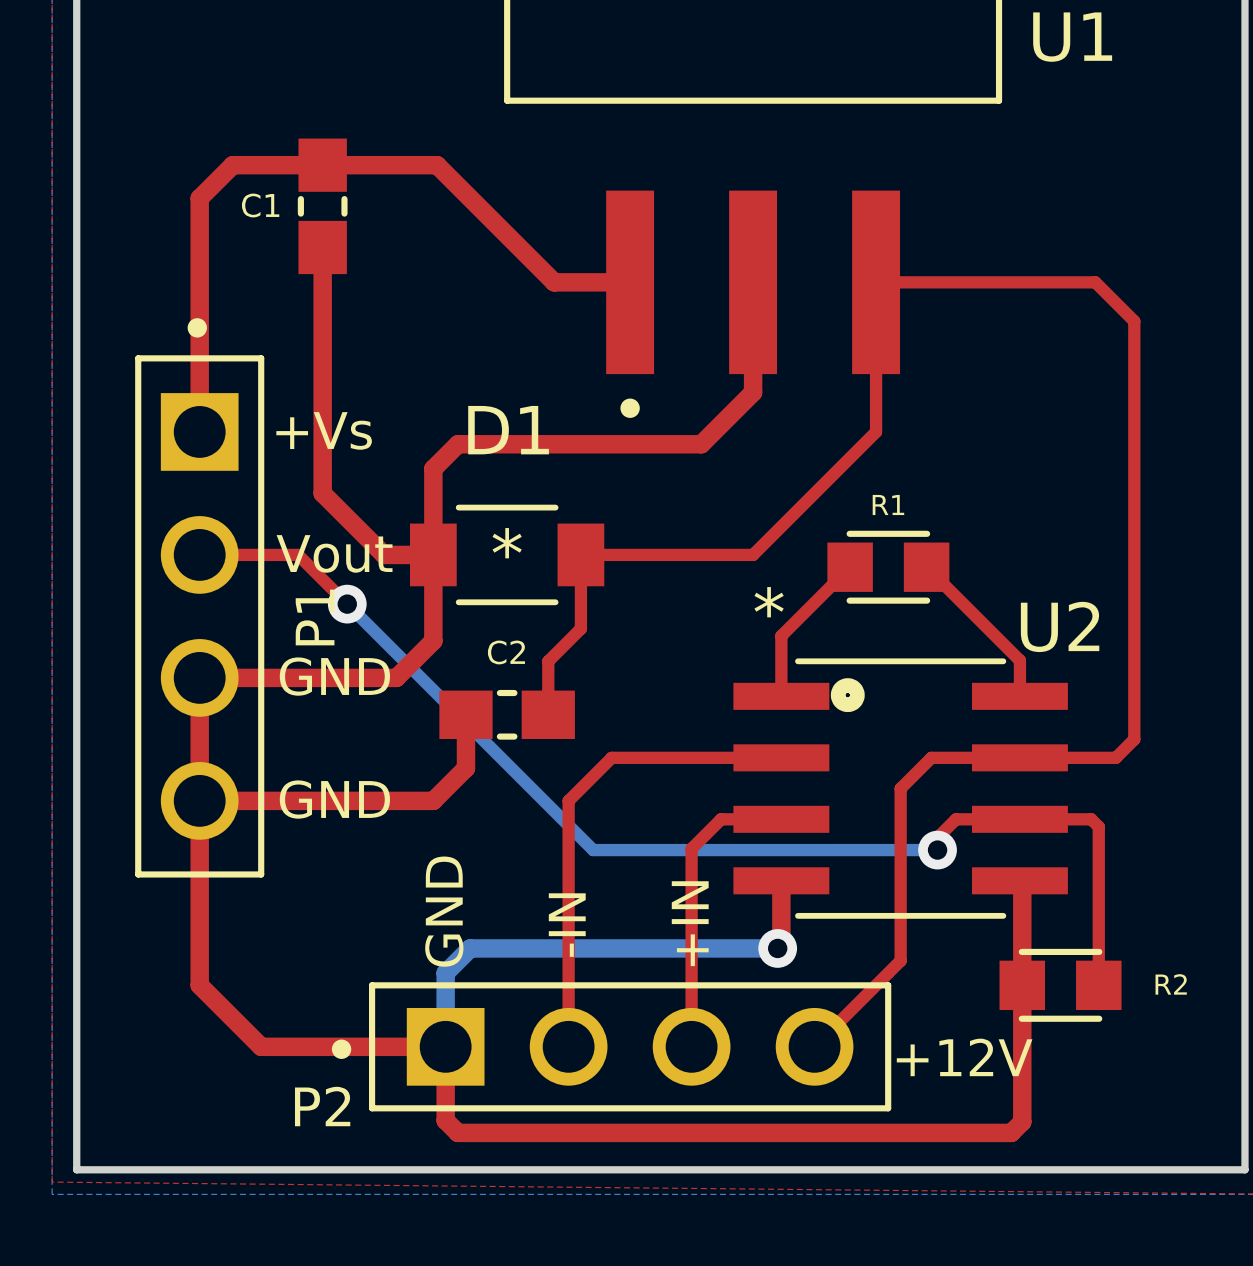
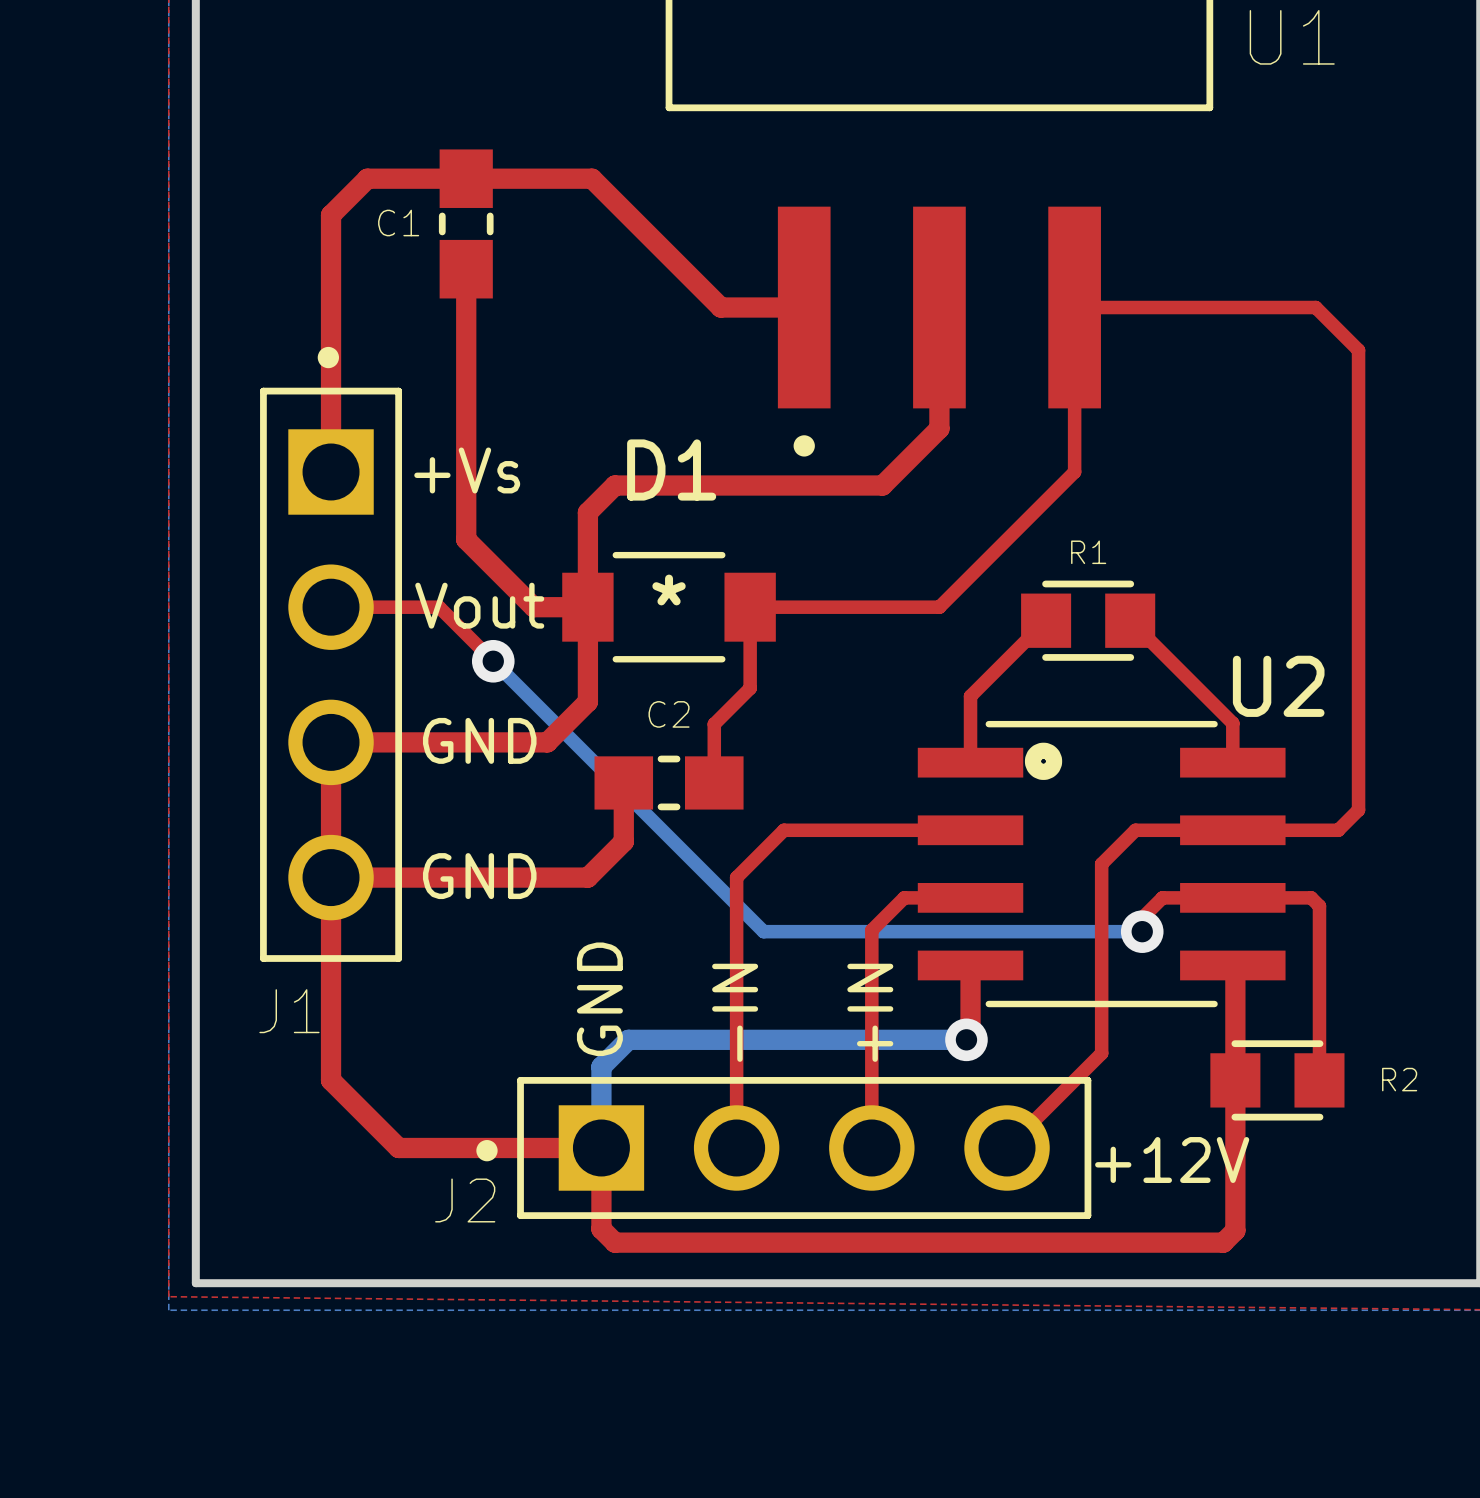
U2 text: * (769, 602) -> none
P1 name: P1 (315, 617) -> J1 (289, 1011)
P2 name: P2 (322, 1106) -> J2 (465, 1200)

